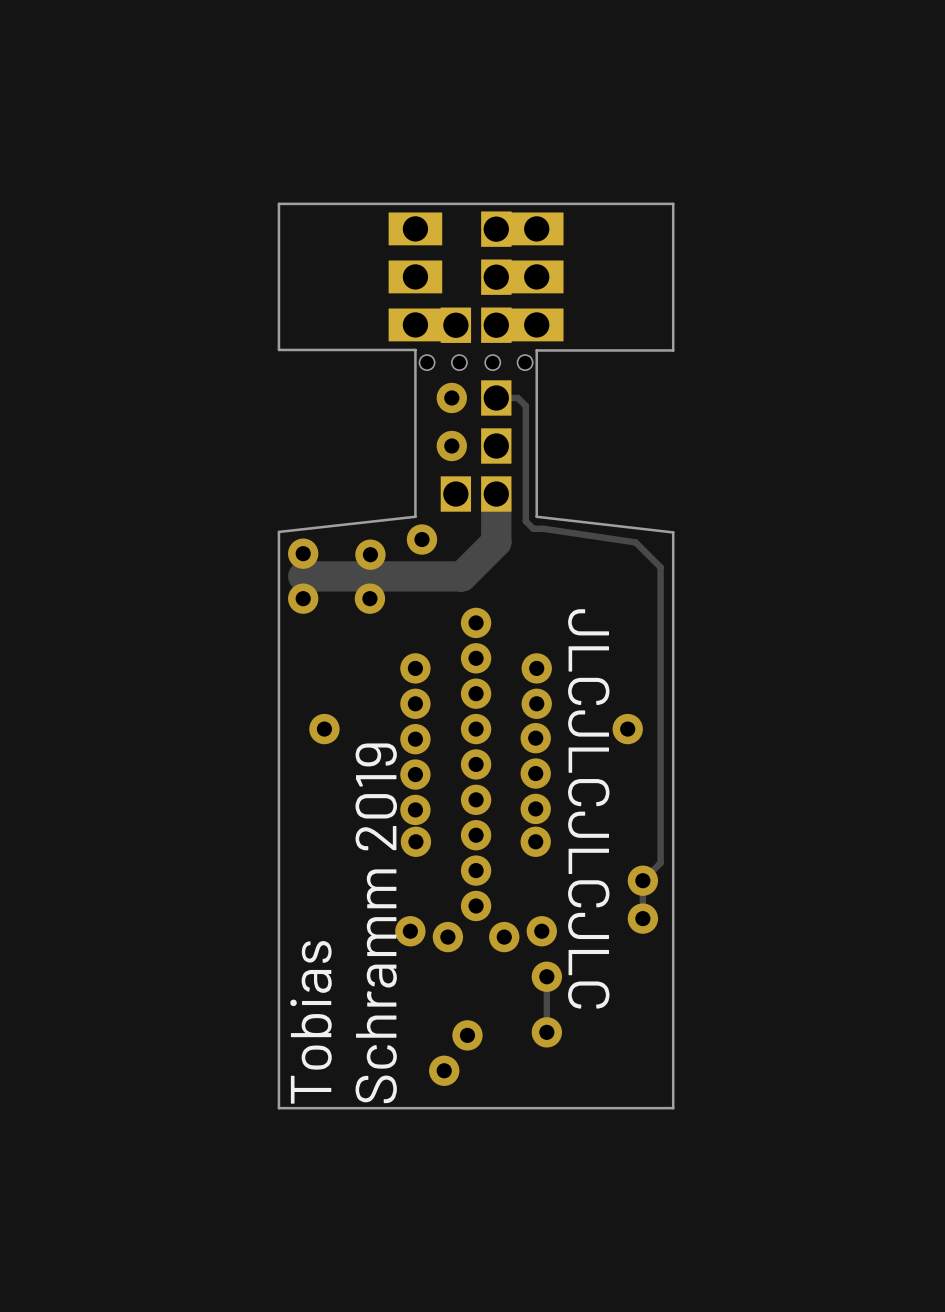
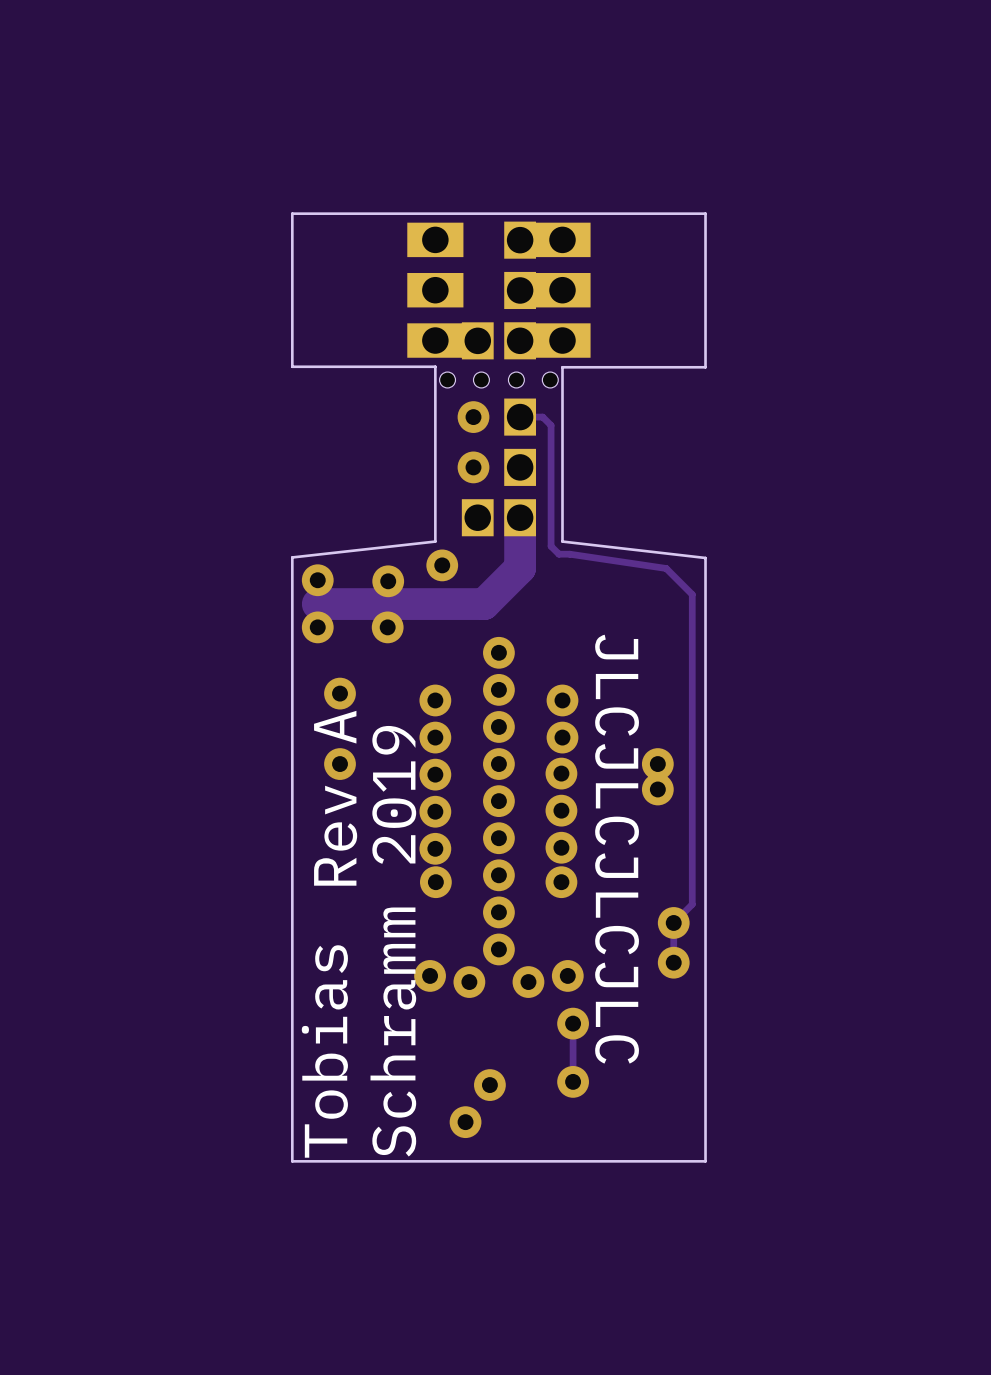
via: none -> (340, 693)
via: none -> (657, 789)
text: none -> Rev A (335, 798)

